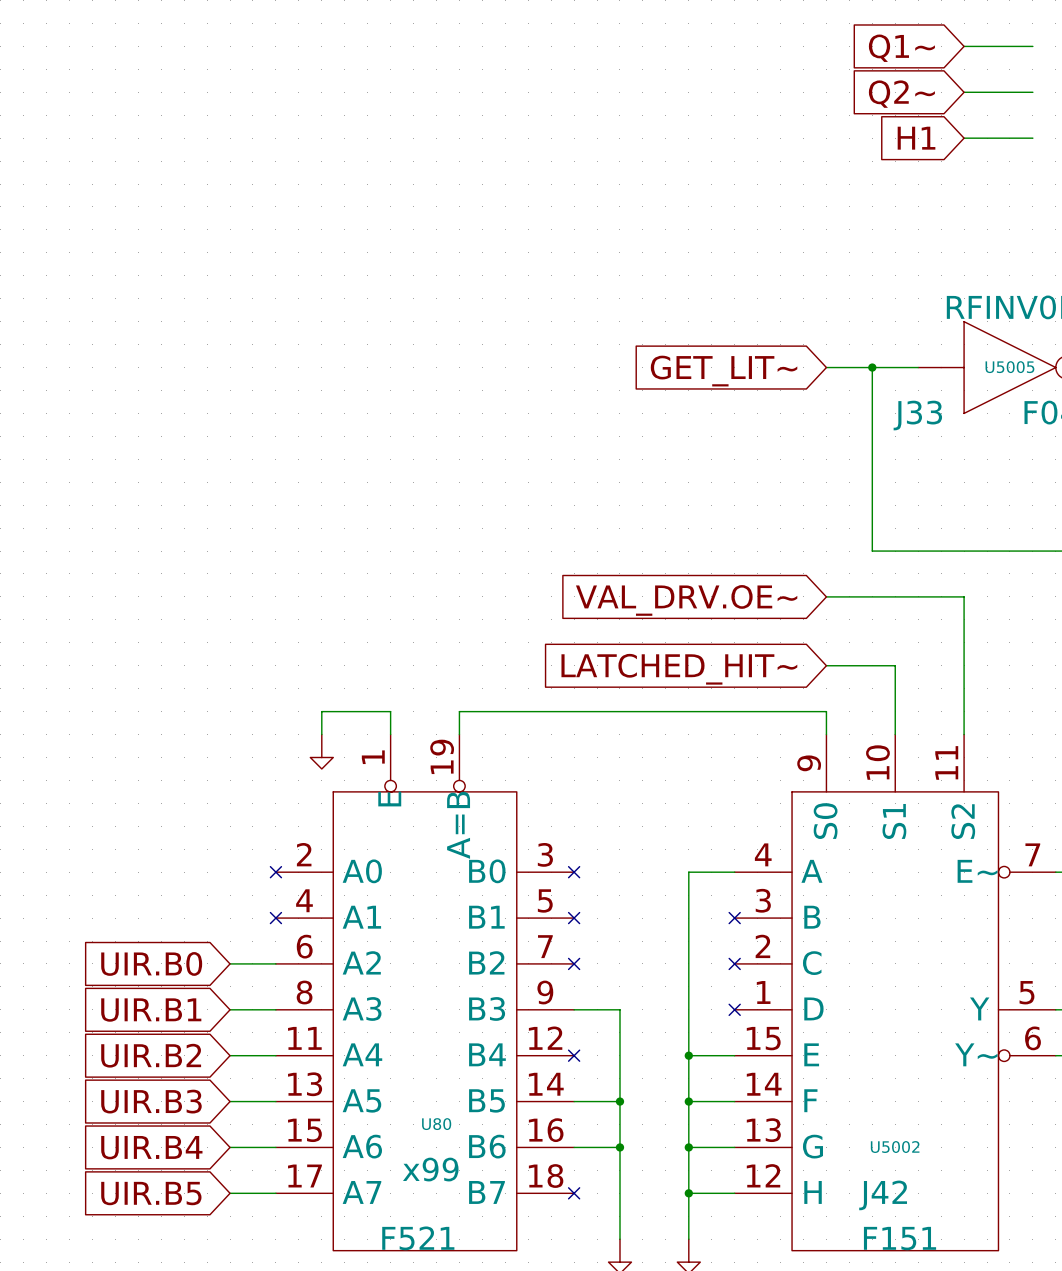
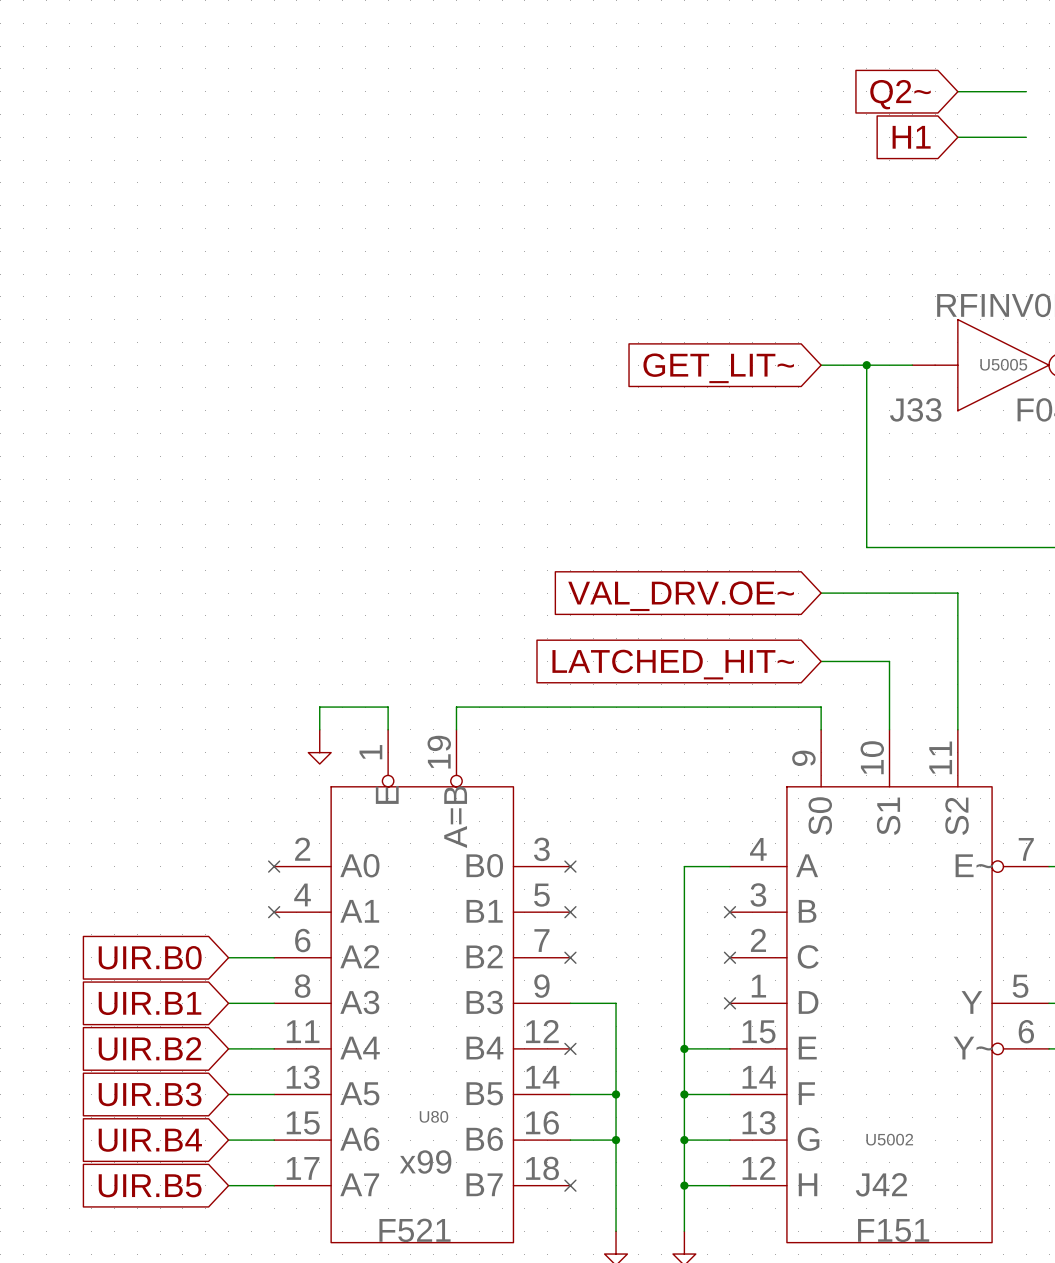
wire: (964, 46) (1032, 46) -> none
global label: Q1~ (901, 48) -> none

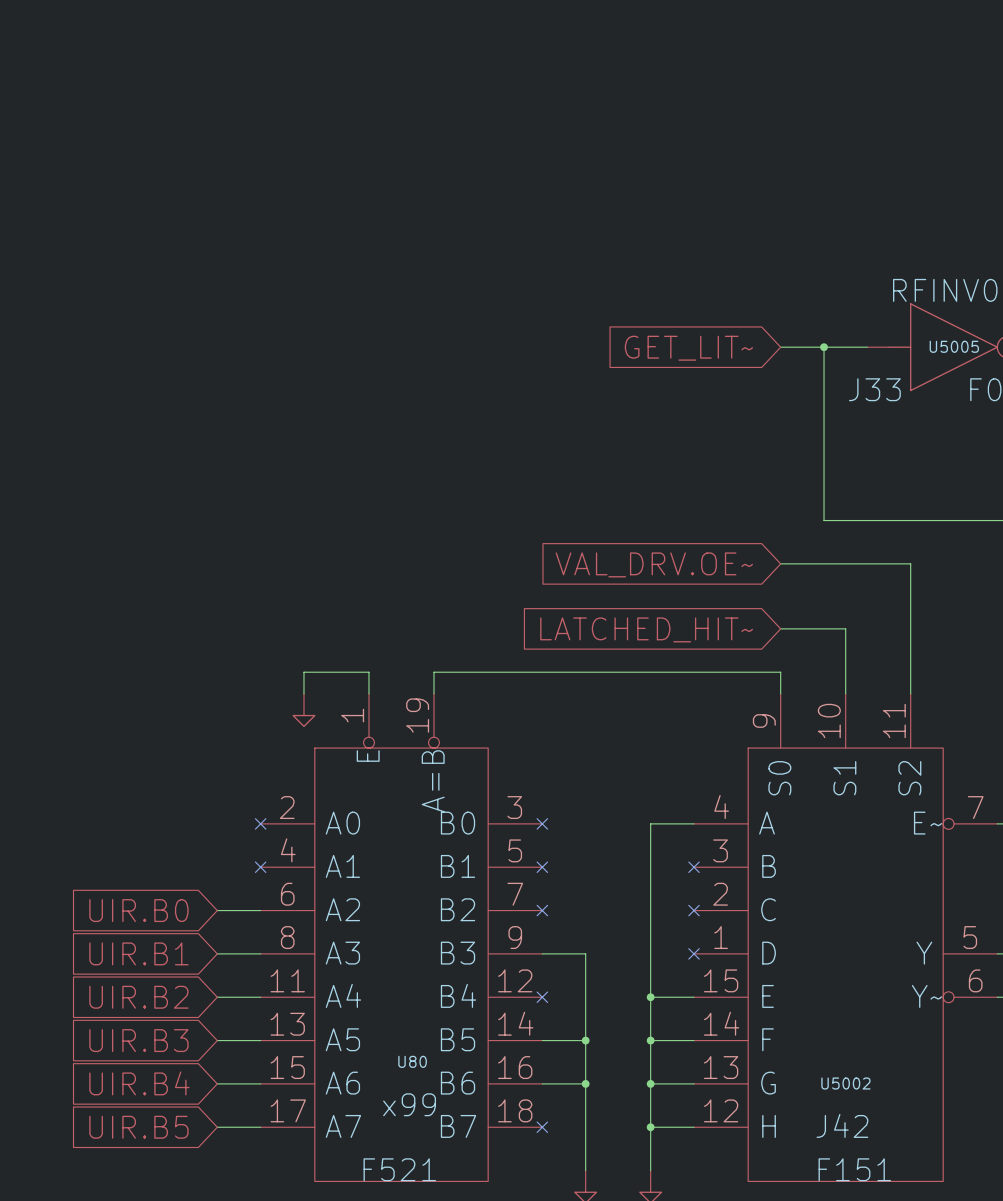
wire: (957, 91) (1026, 91) -> none
global label: Q2~ (900, 94) -> none
global label: H1 (911, 137) -> none
wire: (957, 137) (1026, 137) -> none

